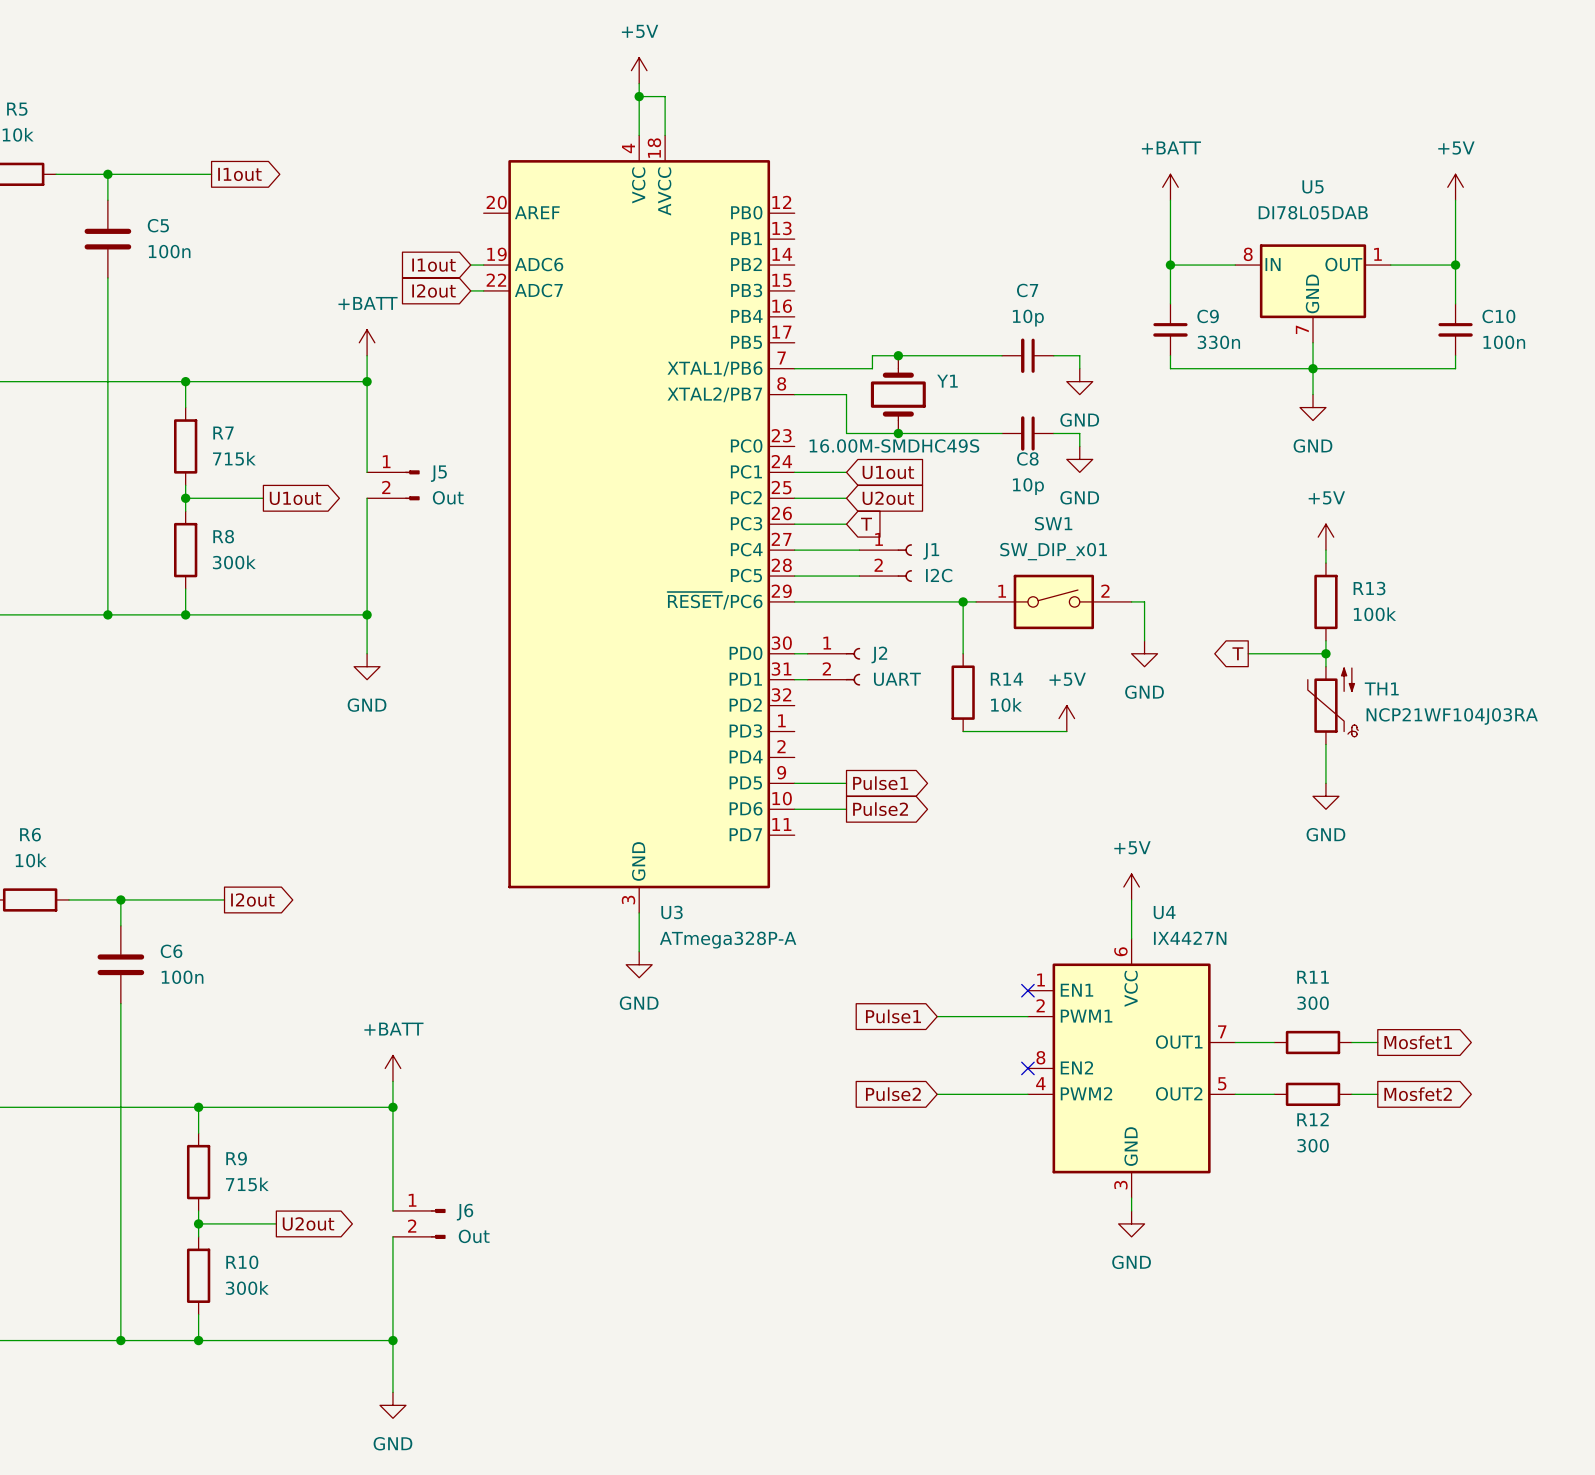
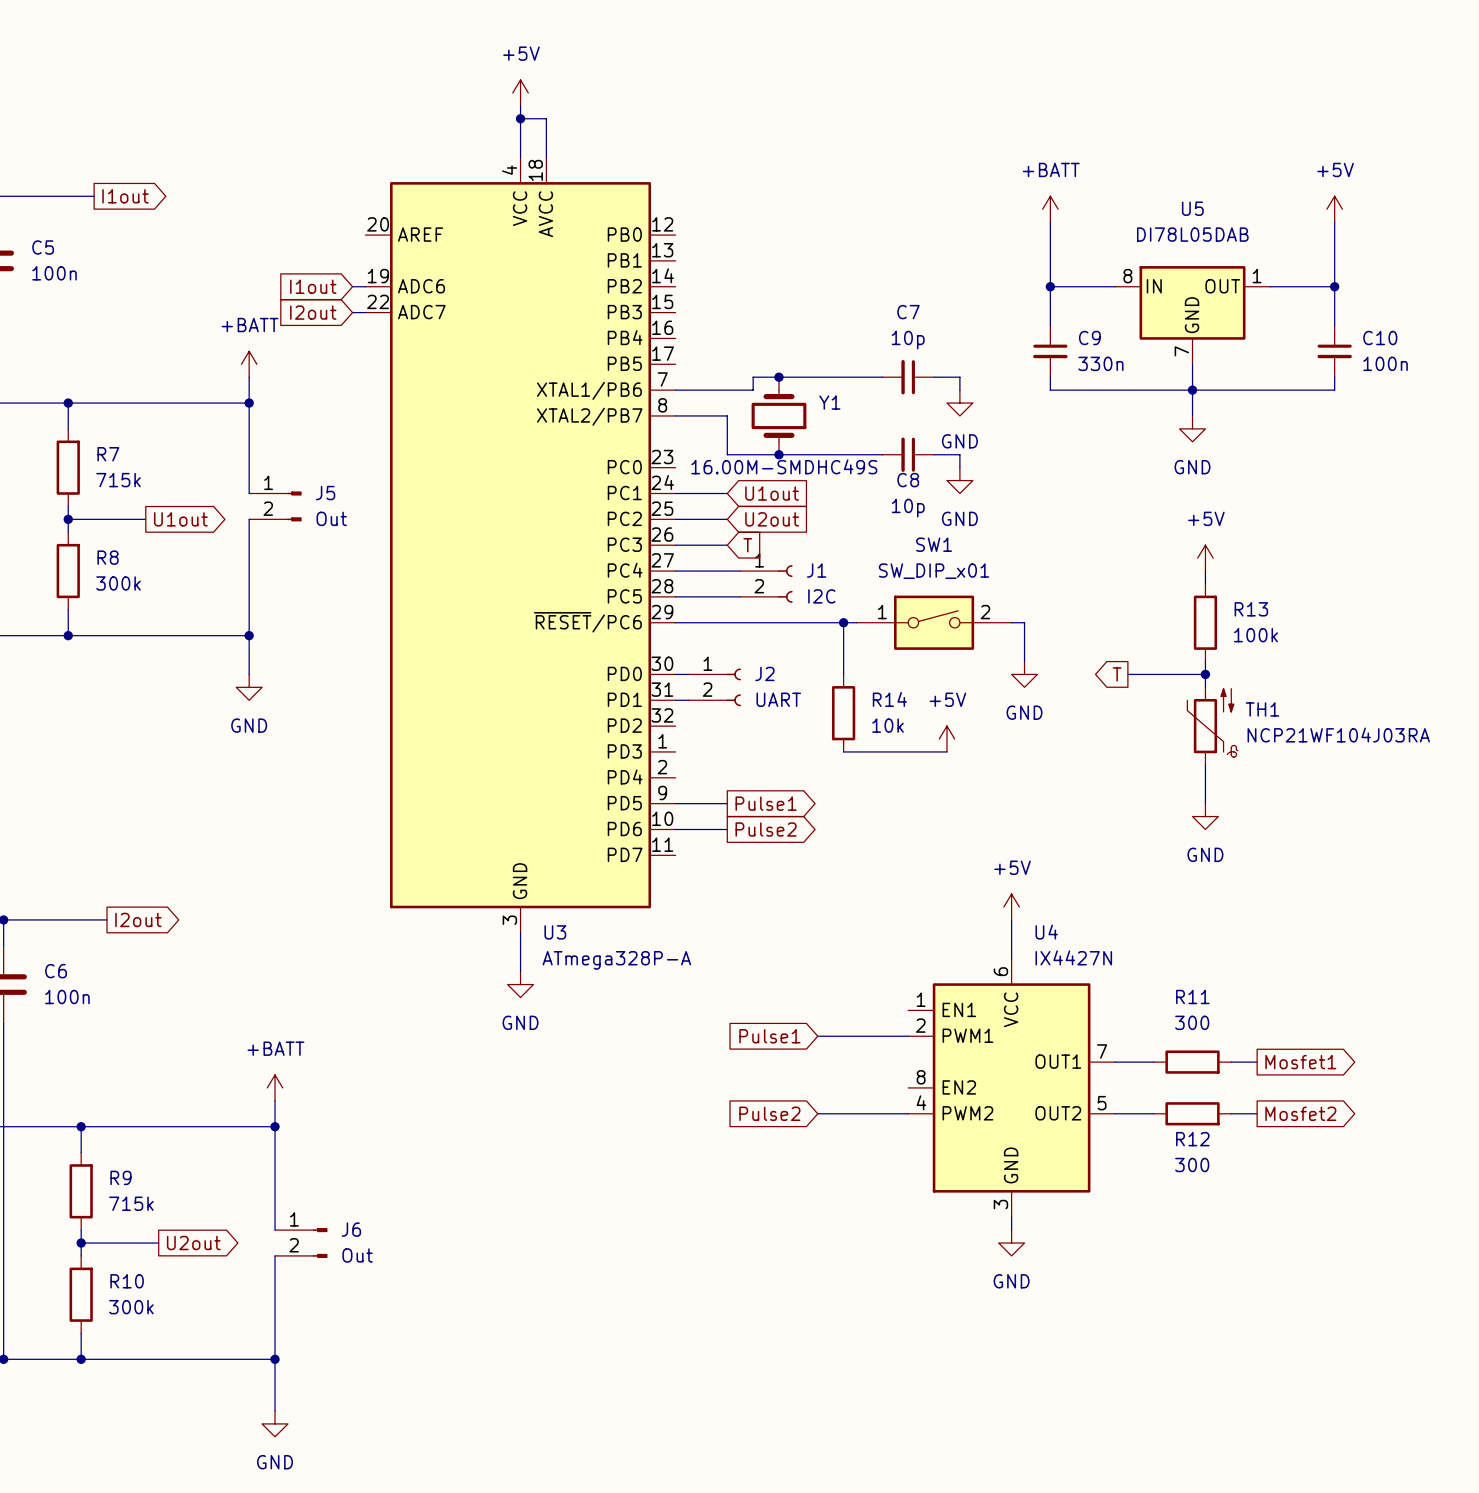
no-connect mark: (1027, 990) -> none
no-connect mark: (1027, 1068) -> none

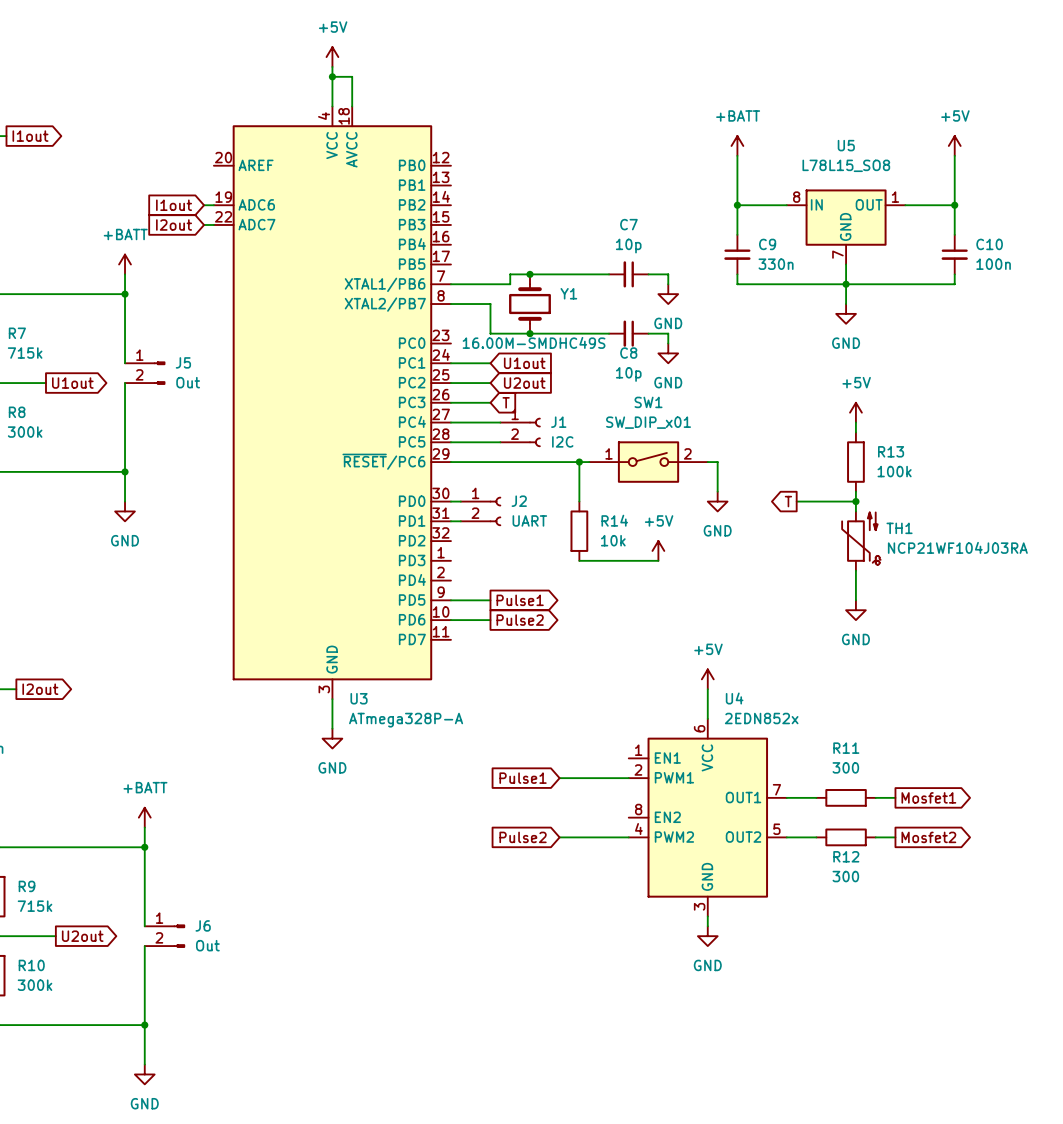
U5 value: DI78L05DAB (1192, 234) -> L78L15_SO8 (846, 165)
U4 value: IX4427N (1073, 957) -> 2EDN852x (761, 718)

